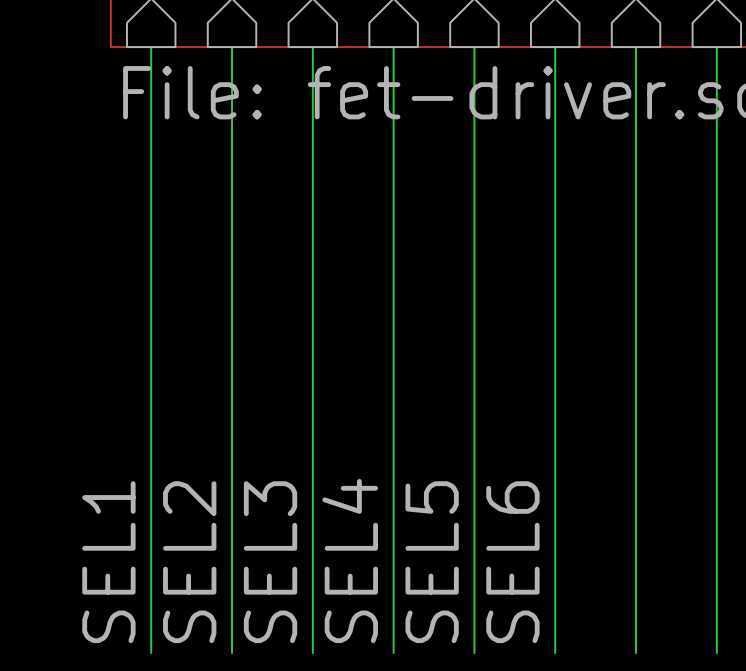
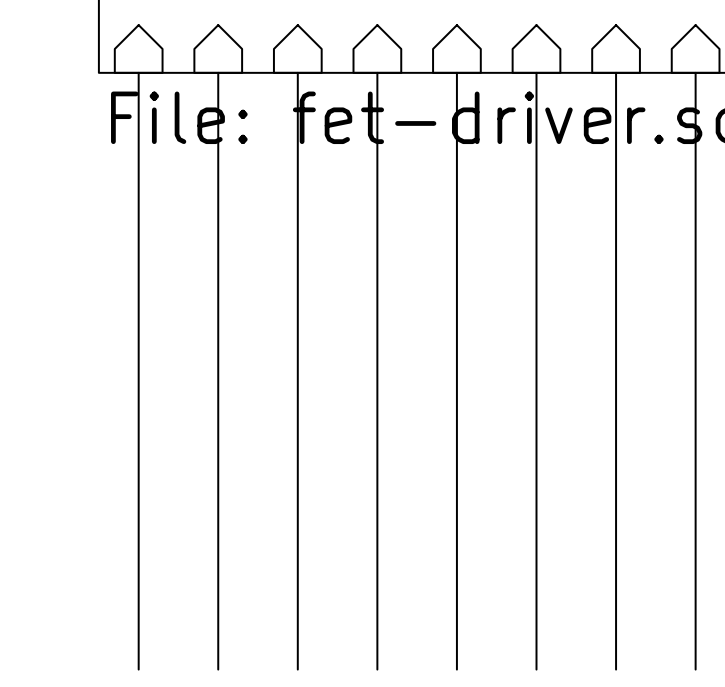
label: SEL4 (350, 561) -> none
label: SEL1 (108, 562) -> none
label: SEL2 (189, 562) -> none
label: SEL3 (270, 562) -> none
label: SEL5 (432, 562) -> none
label: SEL6 (512, 562) -> none

